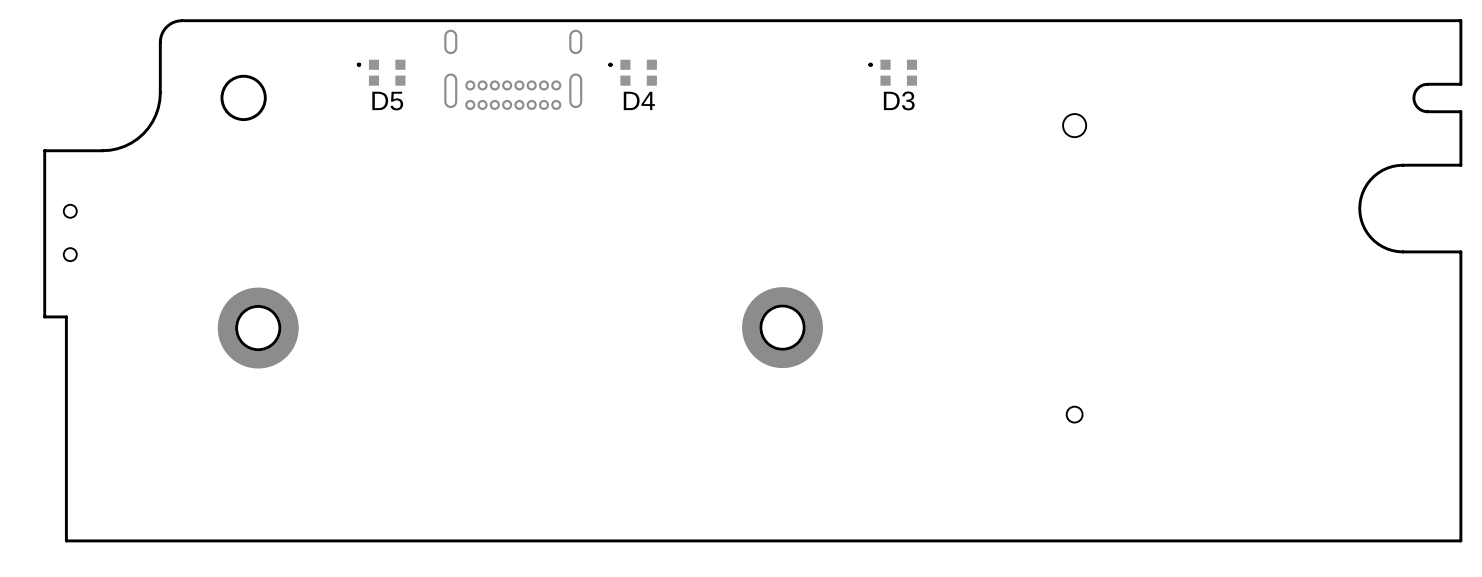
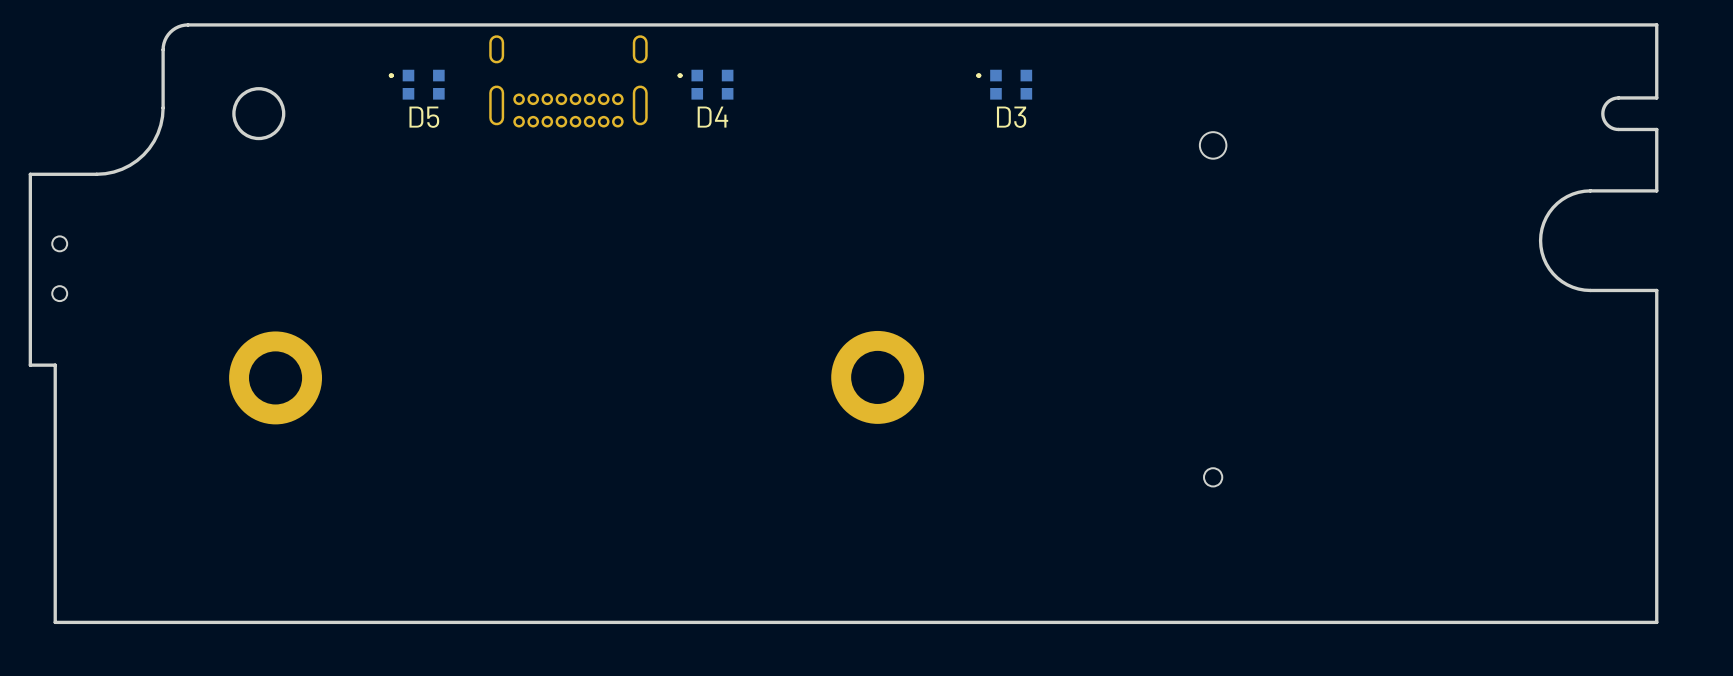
round board edge: [235, 304, 282, 352] -> none
round board edge: [759, 304, 806, 351] -> none

